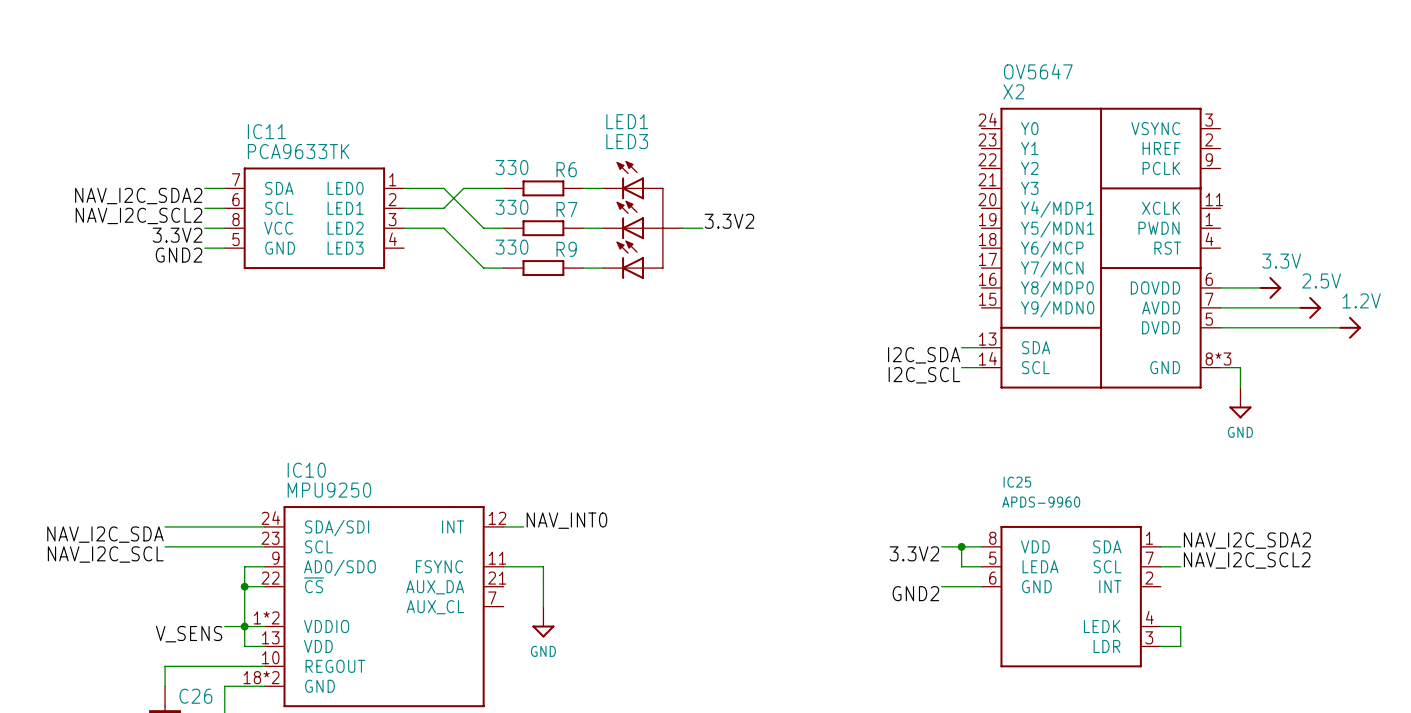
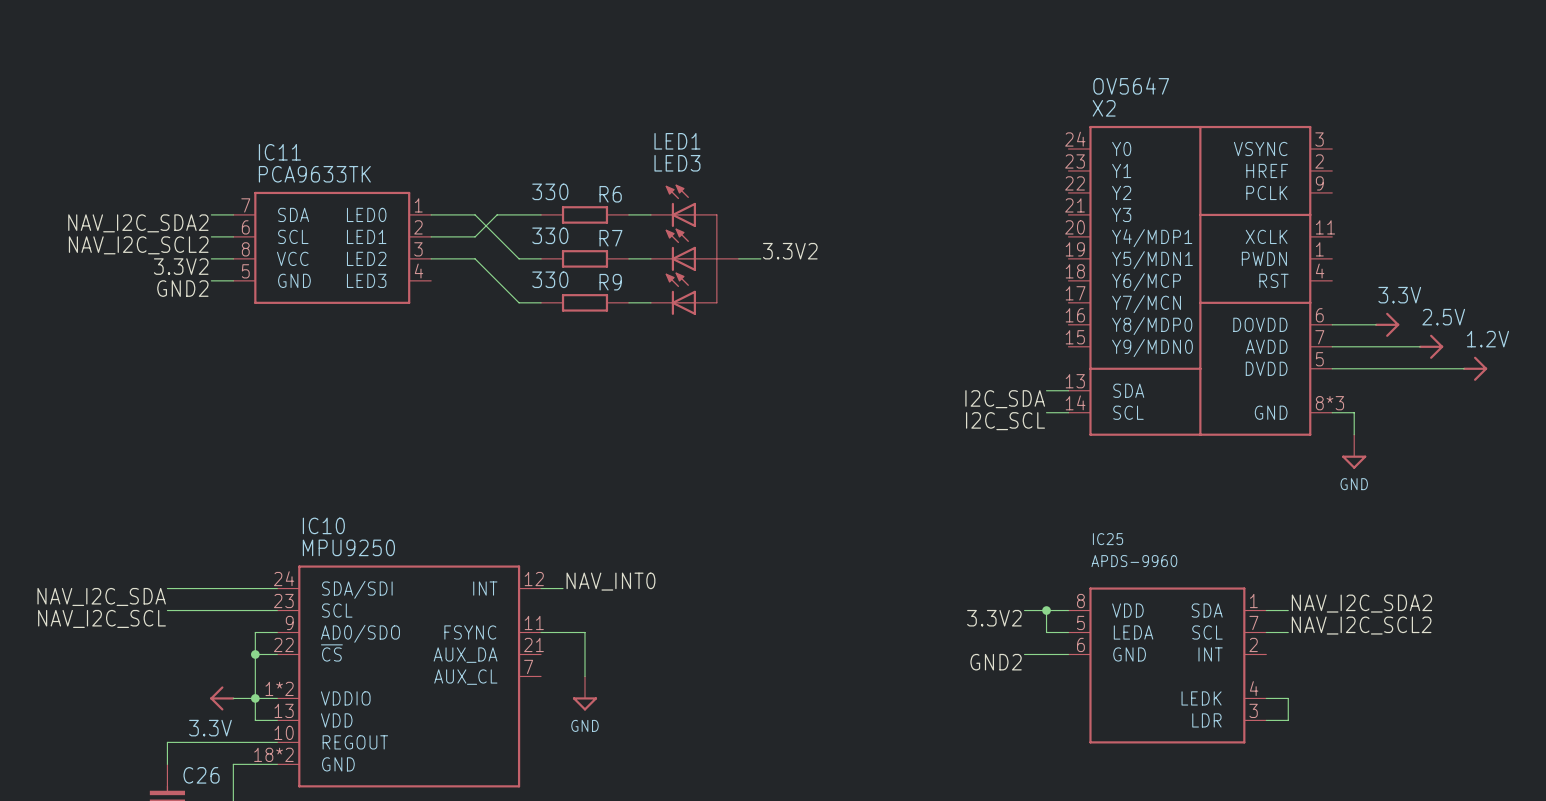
power symbol: none -> 3.3V (222, 698)
label: V_SENS (189, 634) -> none

